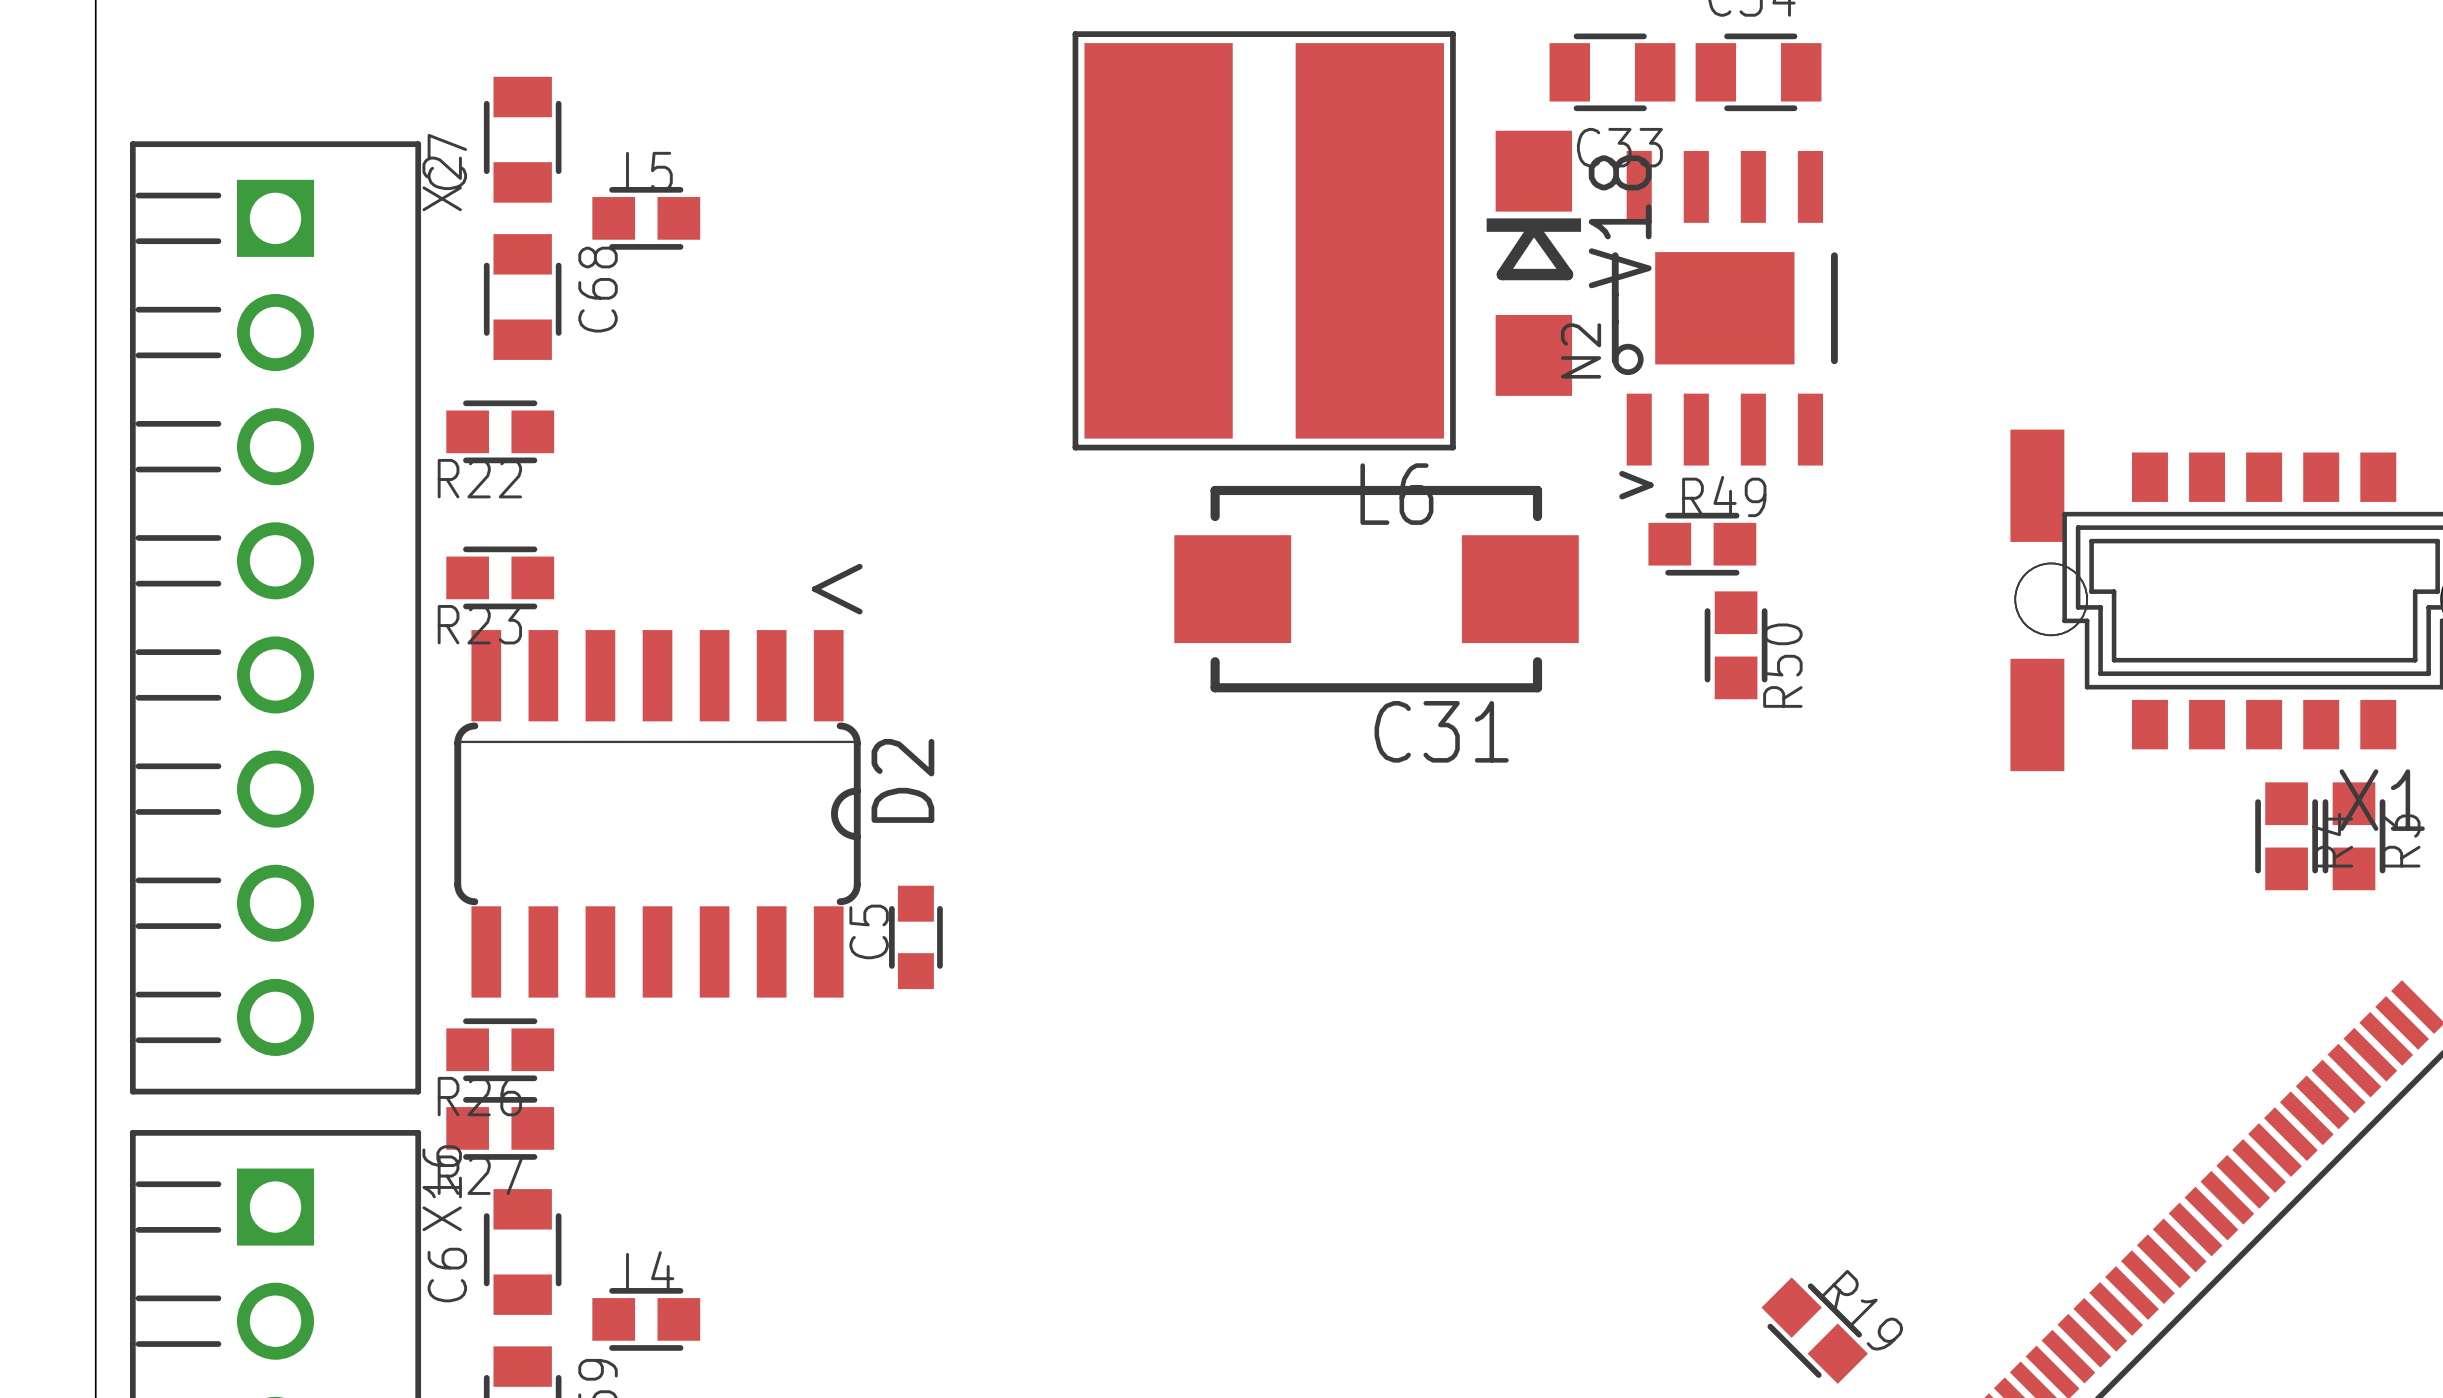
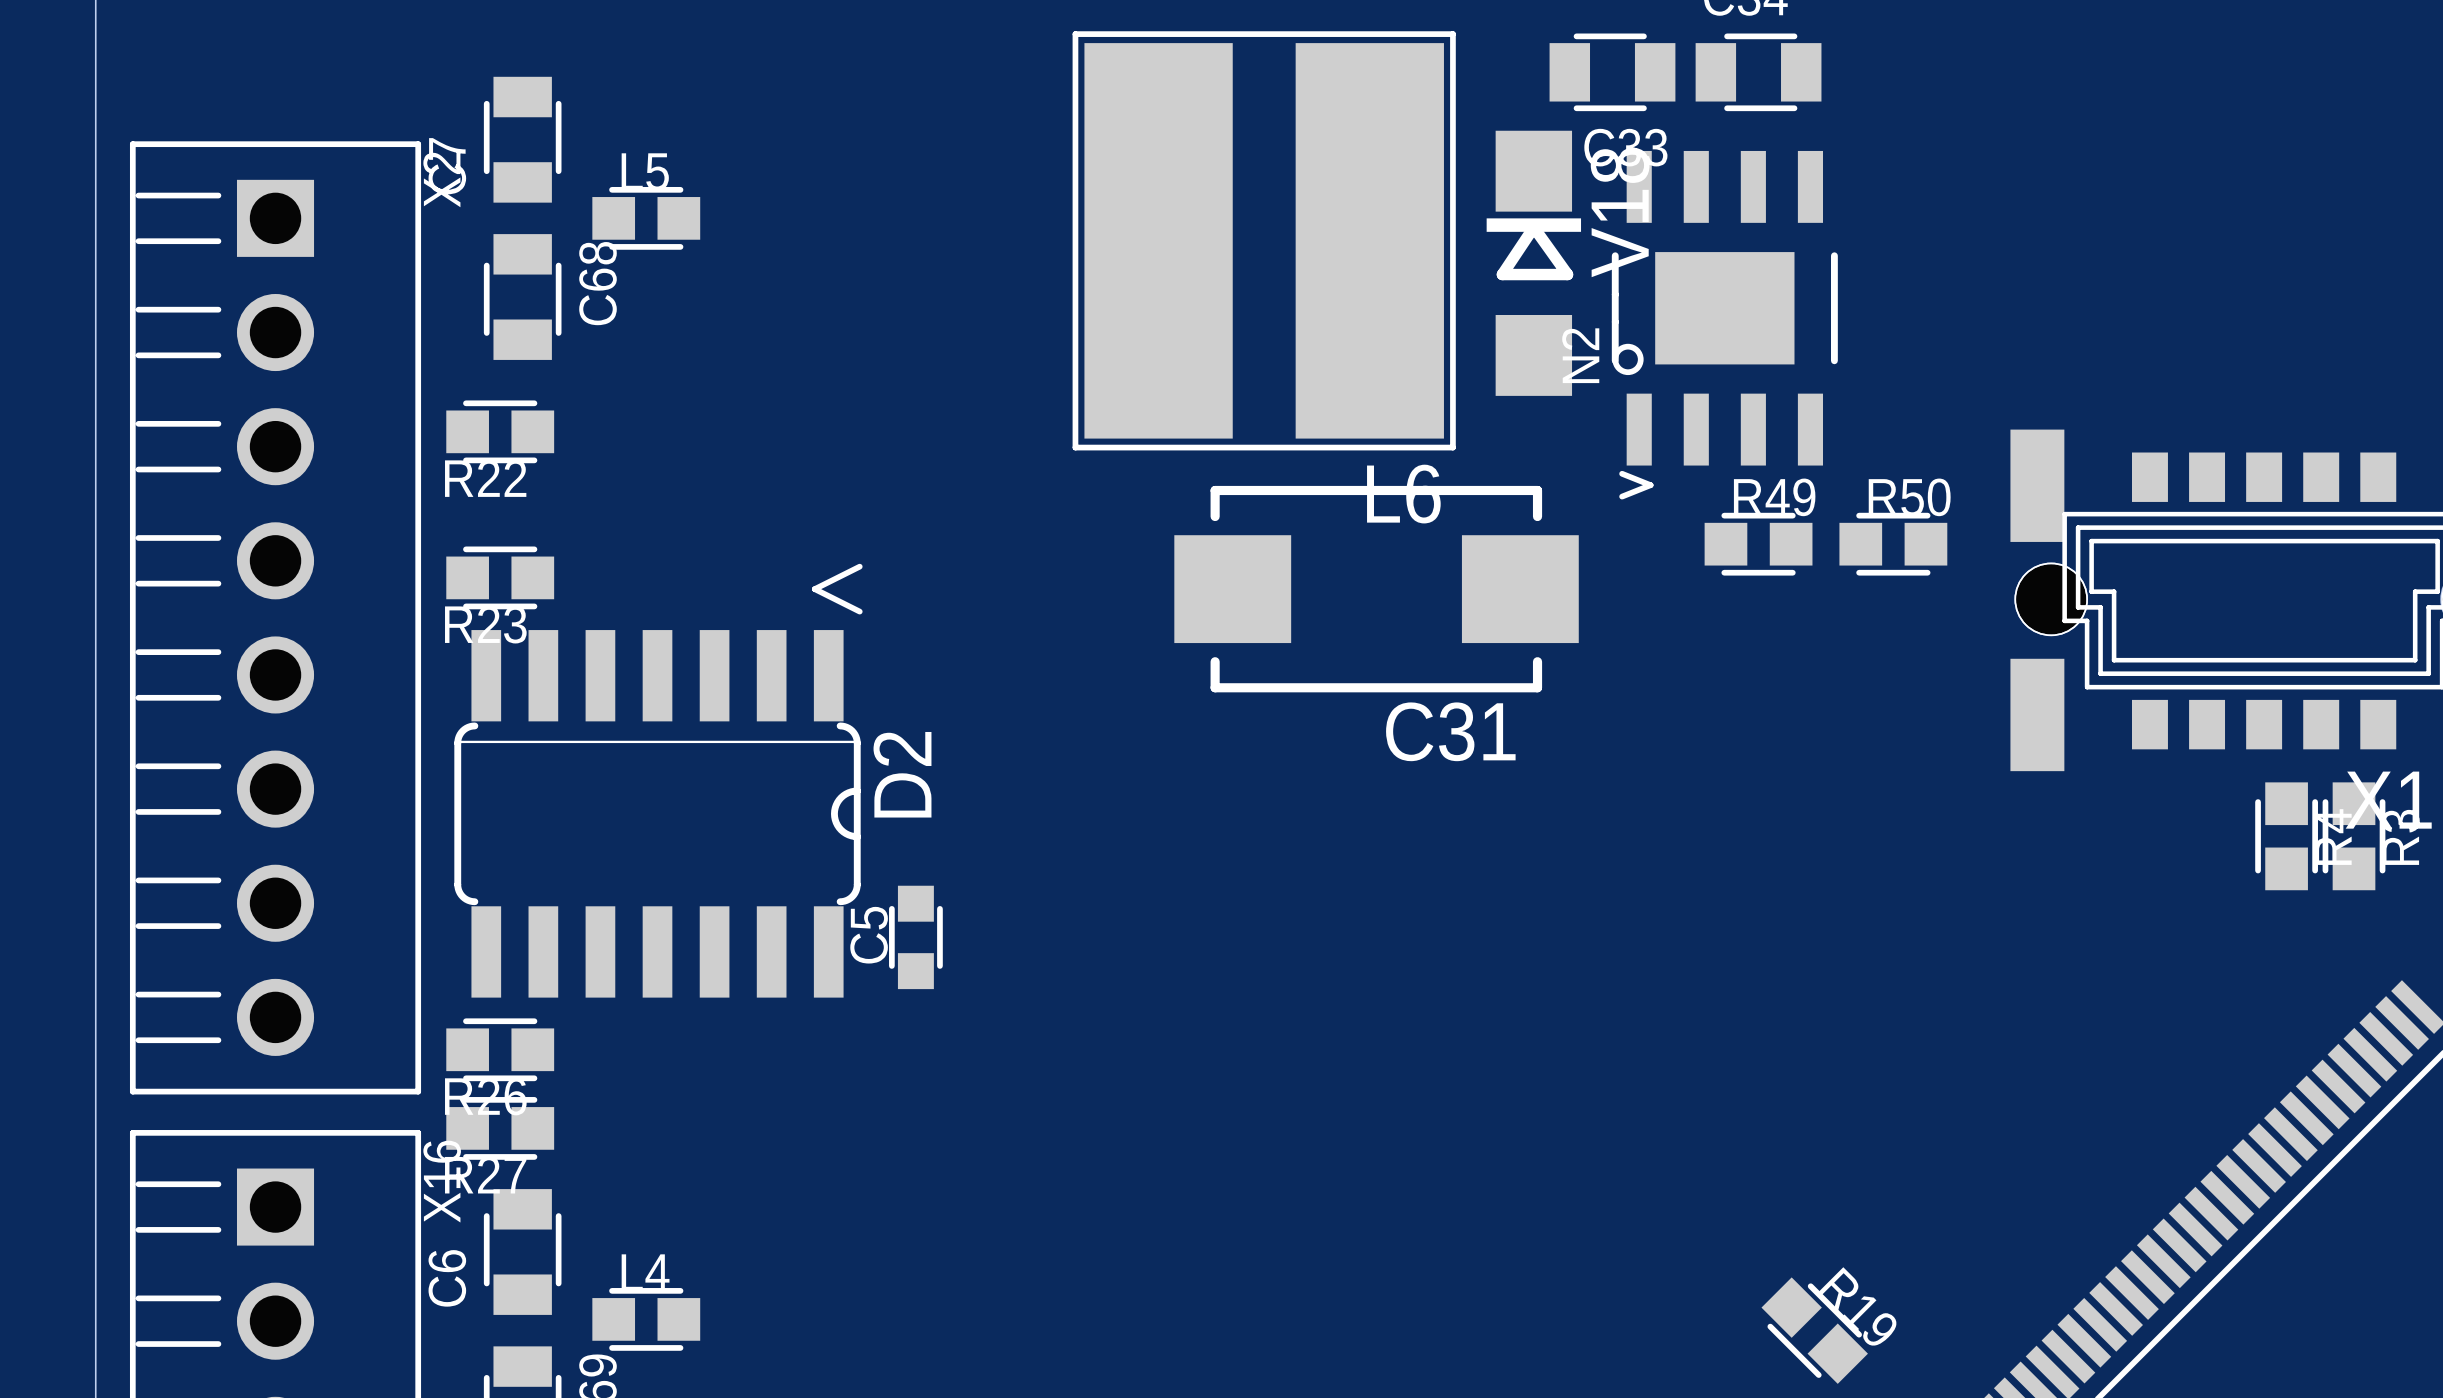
R49 position: (1702, 544) -> (1758, 544)
R50 rotation: 0° (1736, 645) -> 90° clockwise (1893, 544)
R50 position: (1736, 645) -> (1893, 544)

